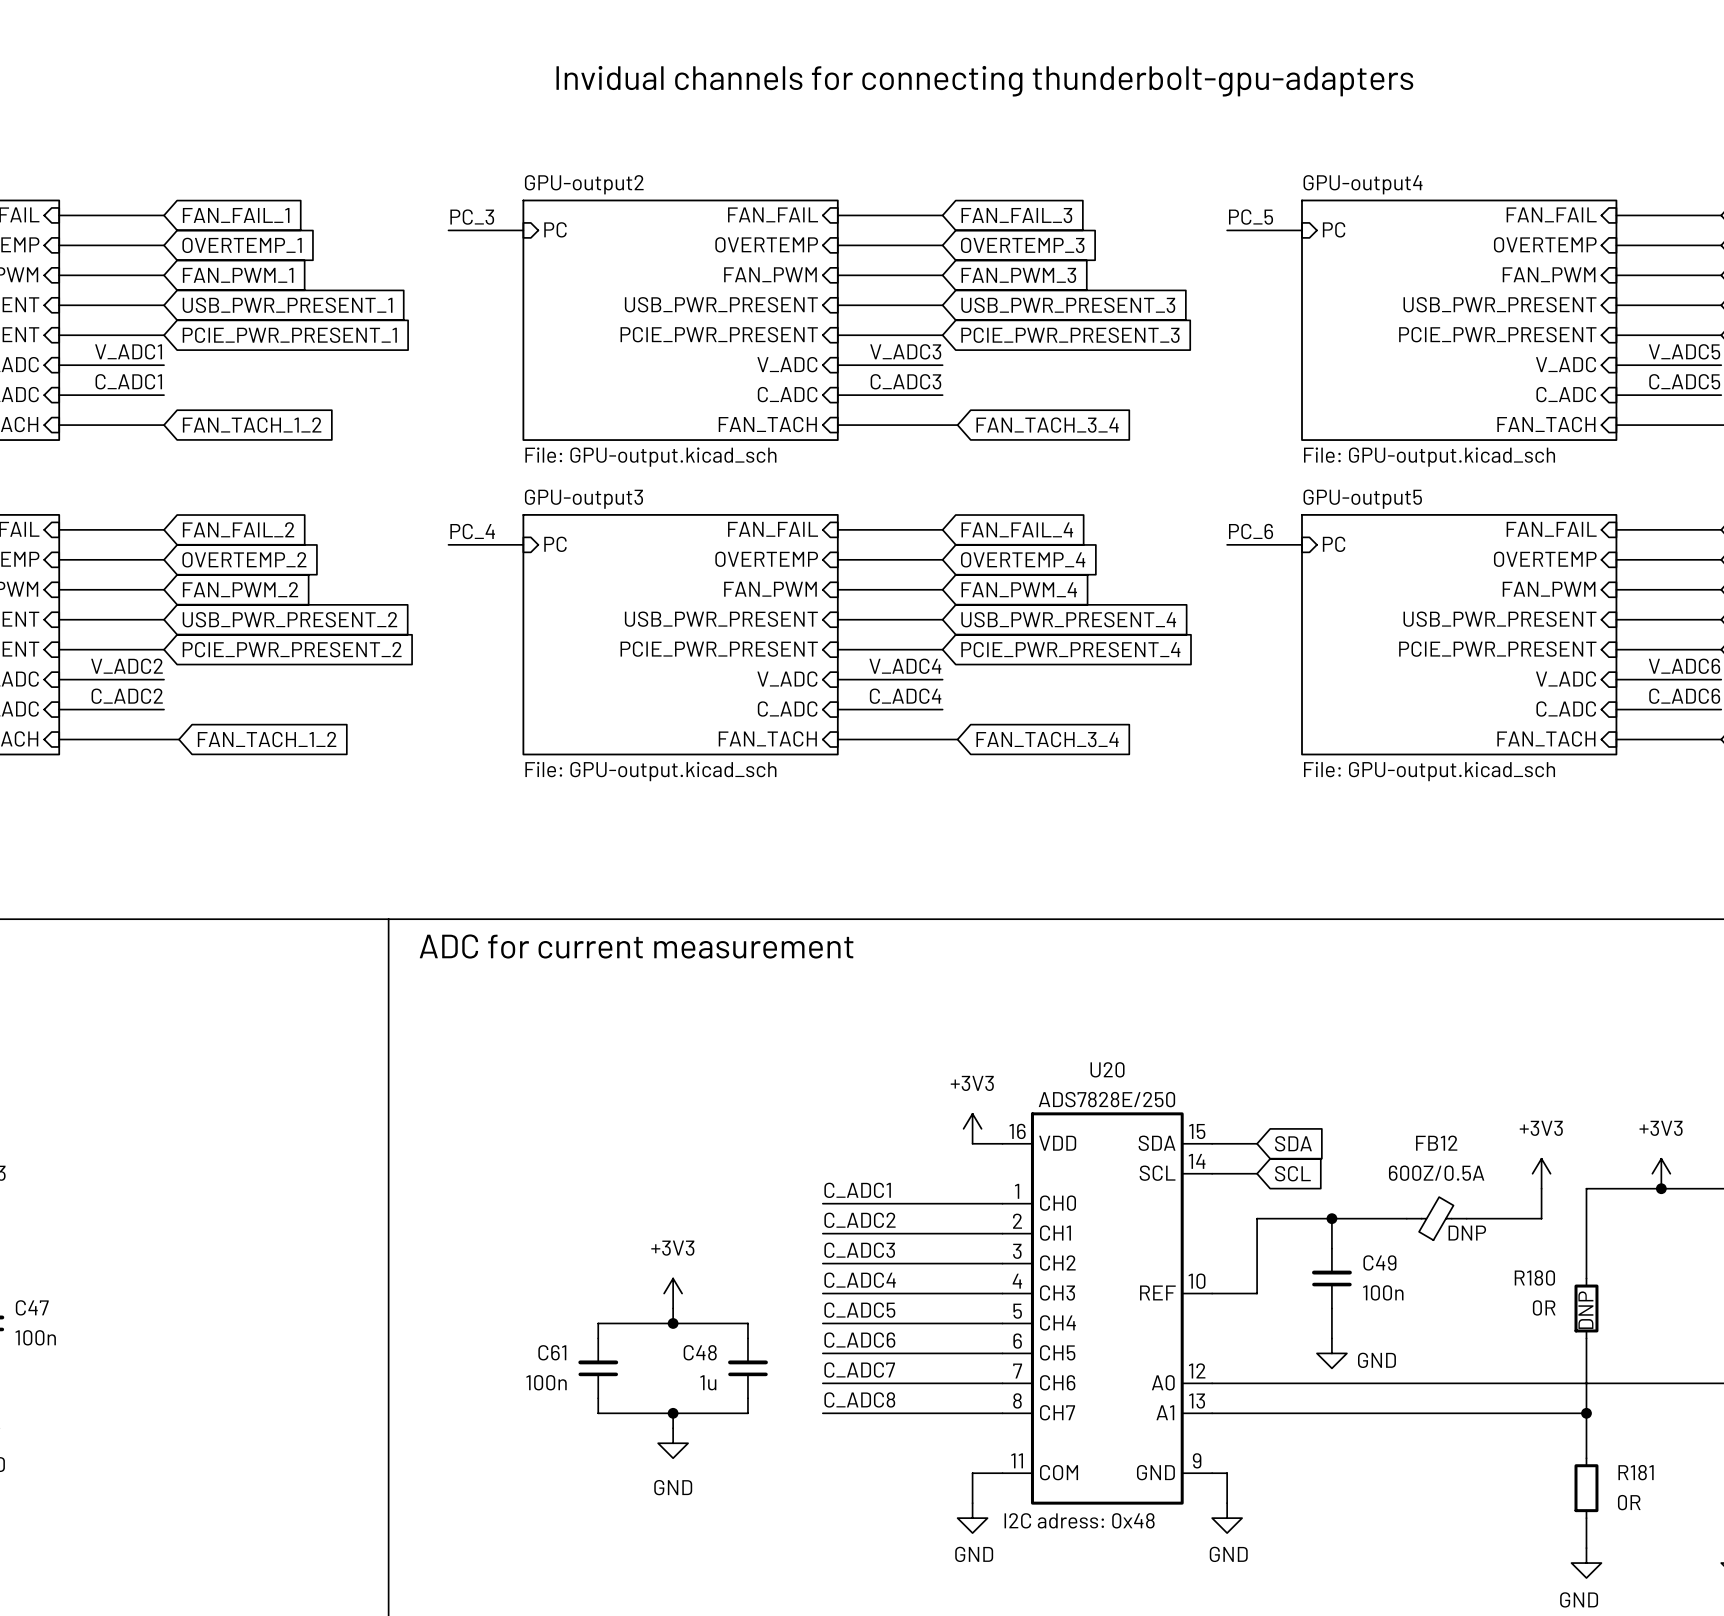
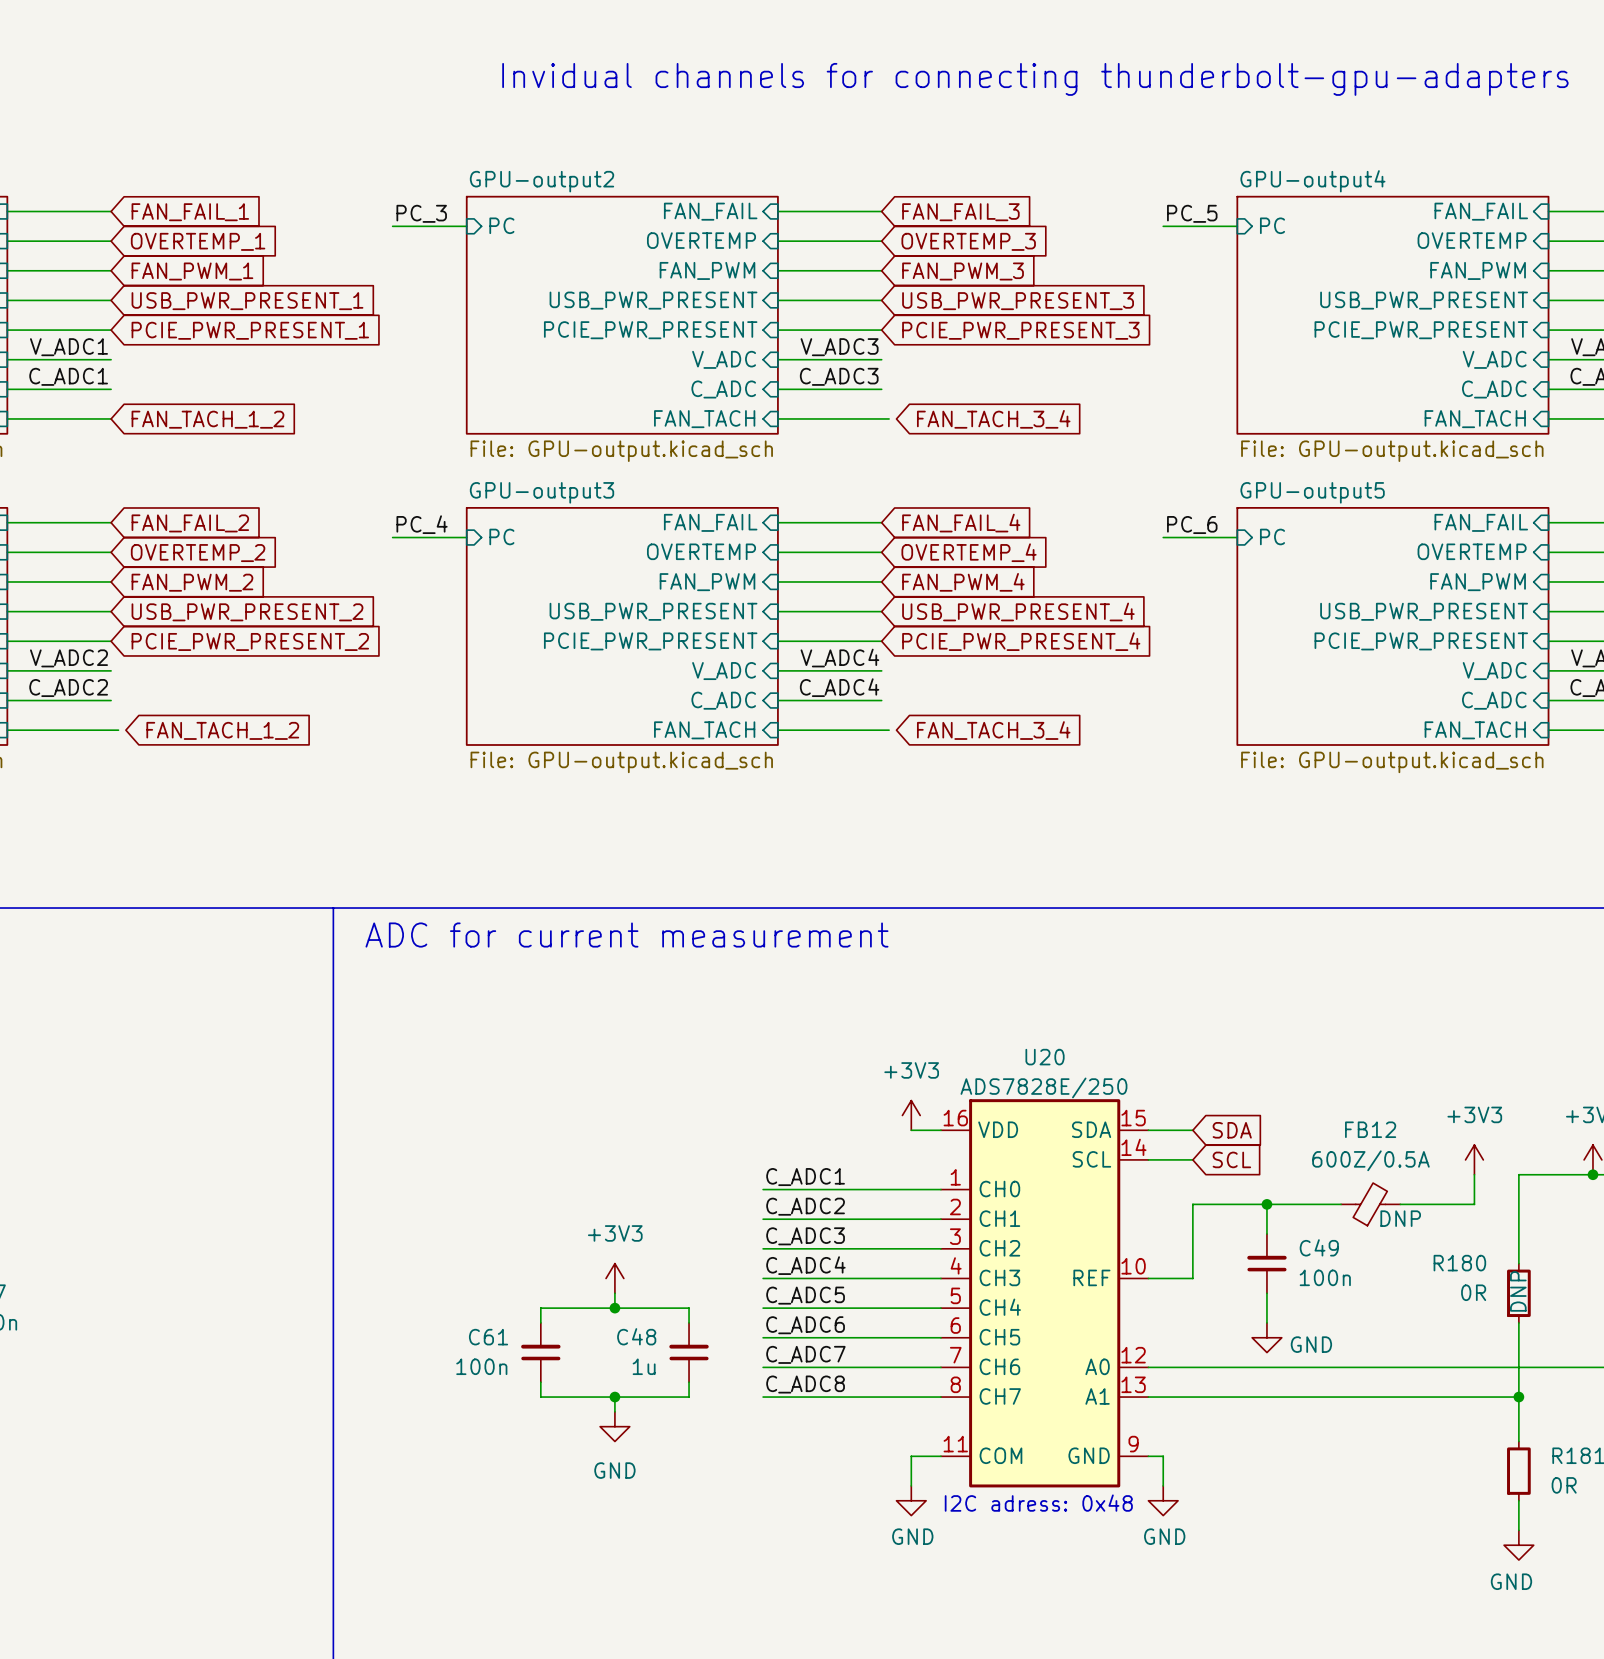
wire: (950, 425) (957, 425) -> none
wire: (171, 739) (178, 739) -> none
wire: (950, 739) (957, 739) -> none

